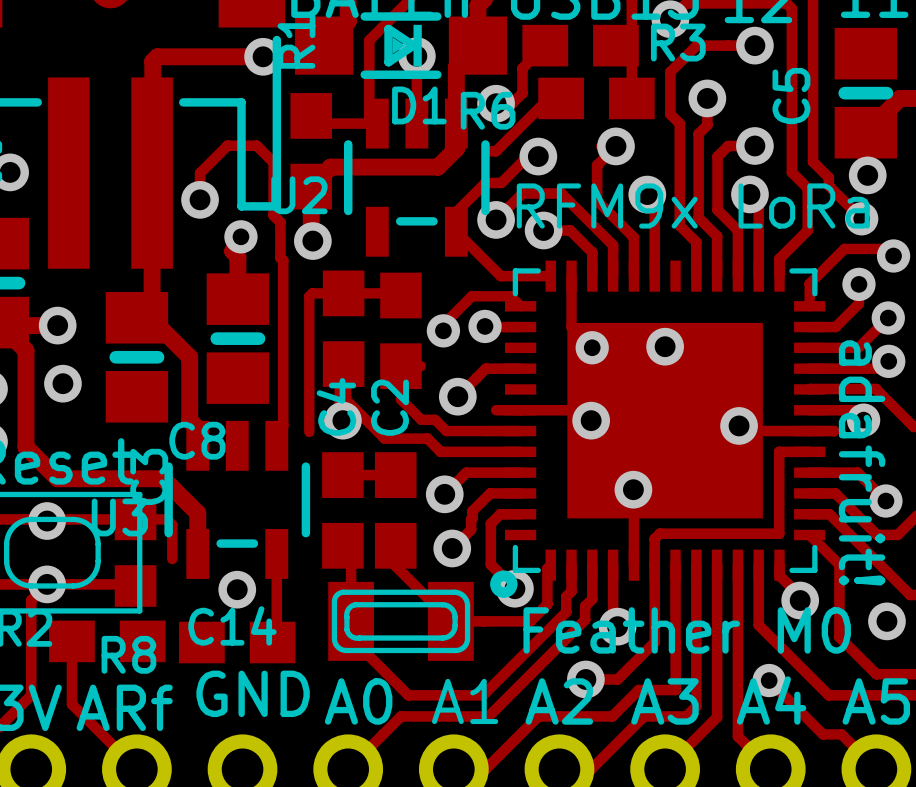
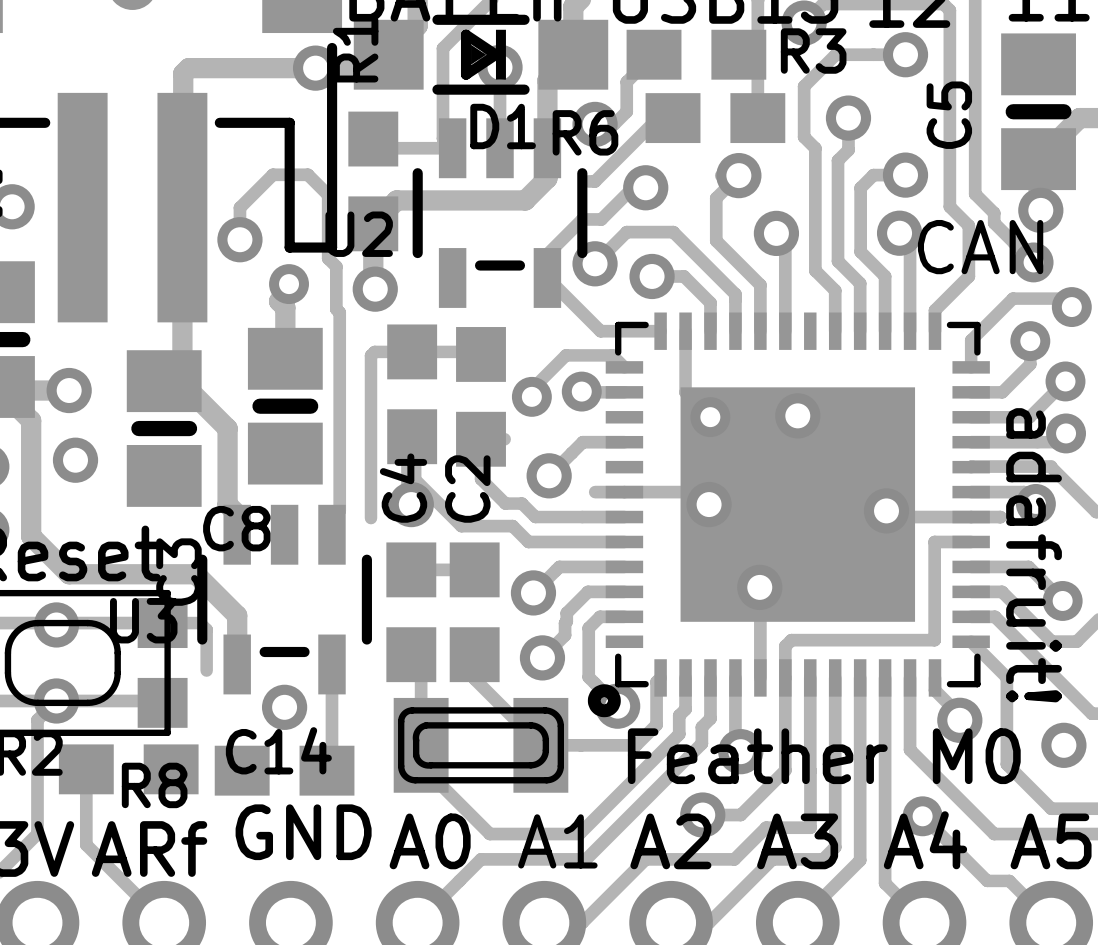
text: RFM9x LoRa (693, 206) -> CAN (980, 247)

